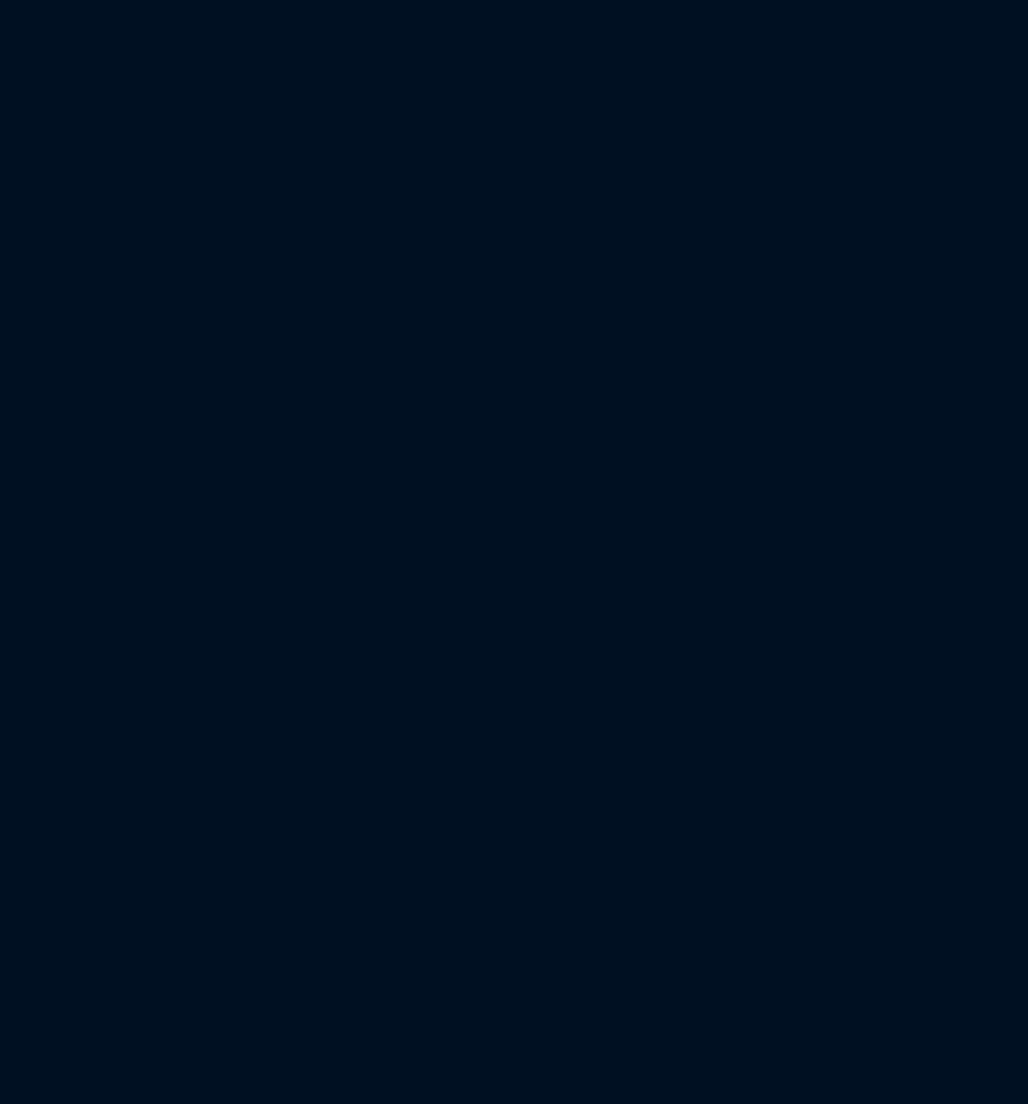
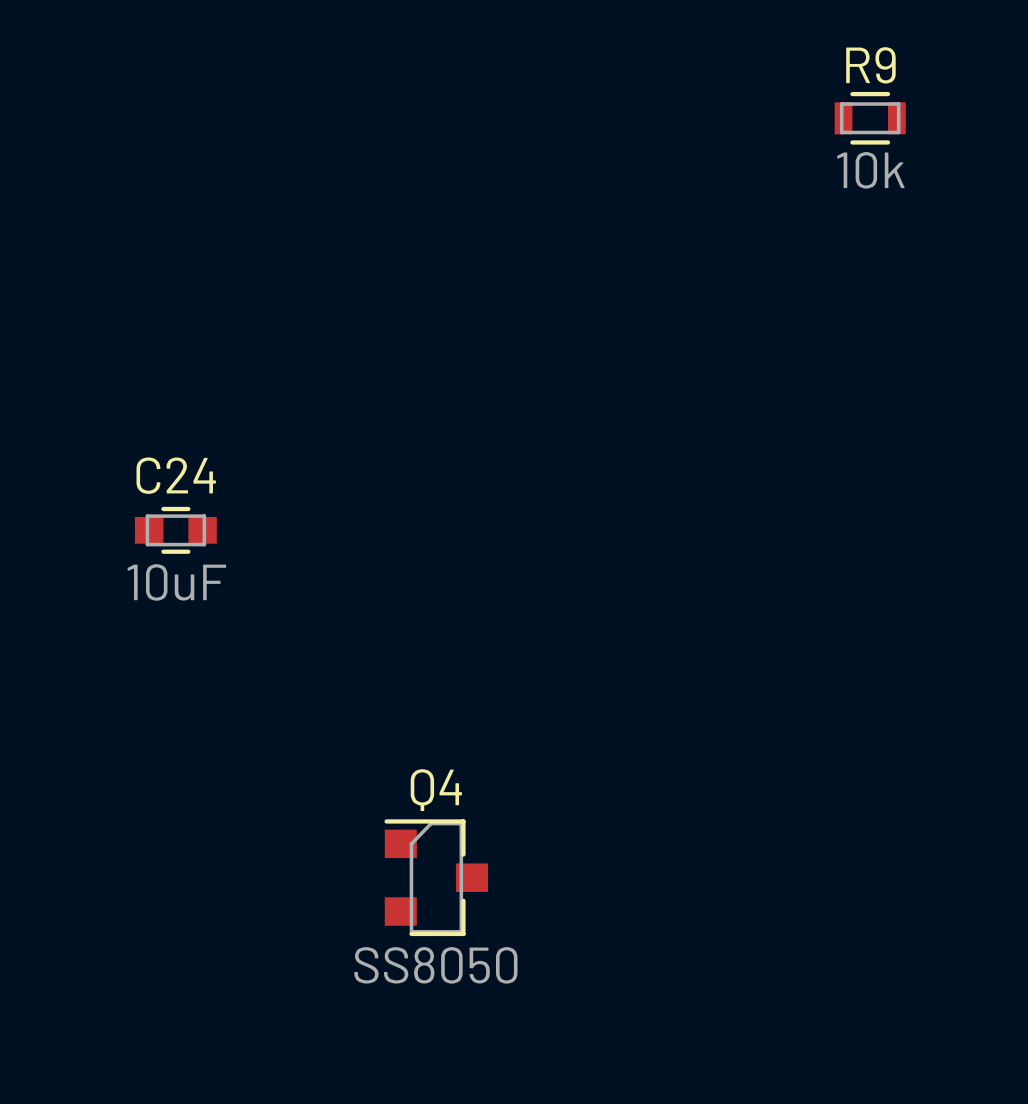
R9: none -> 10k (870, 118)
C24: none -> 10uF (175, 530)
Q4: none -> SS8050 (436, 877)

